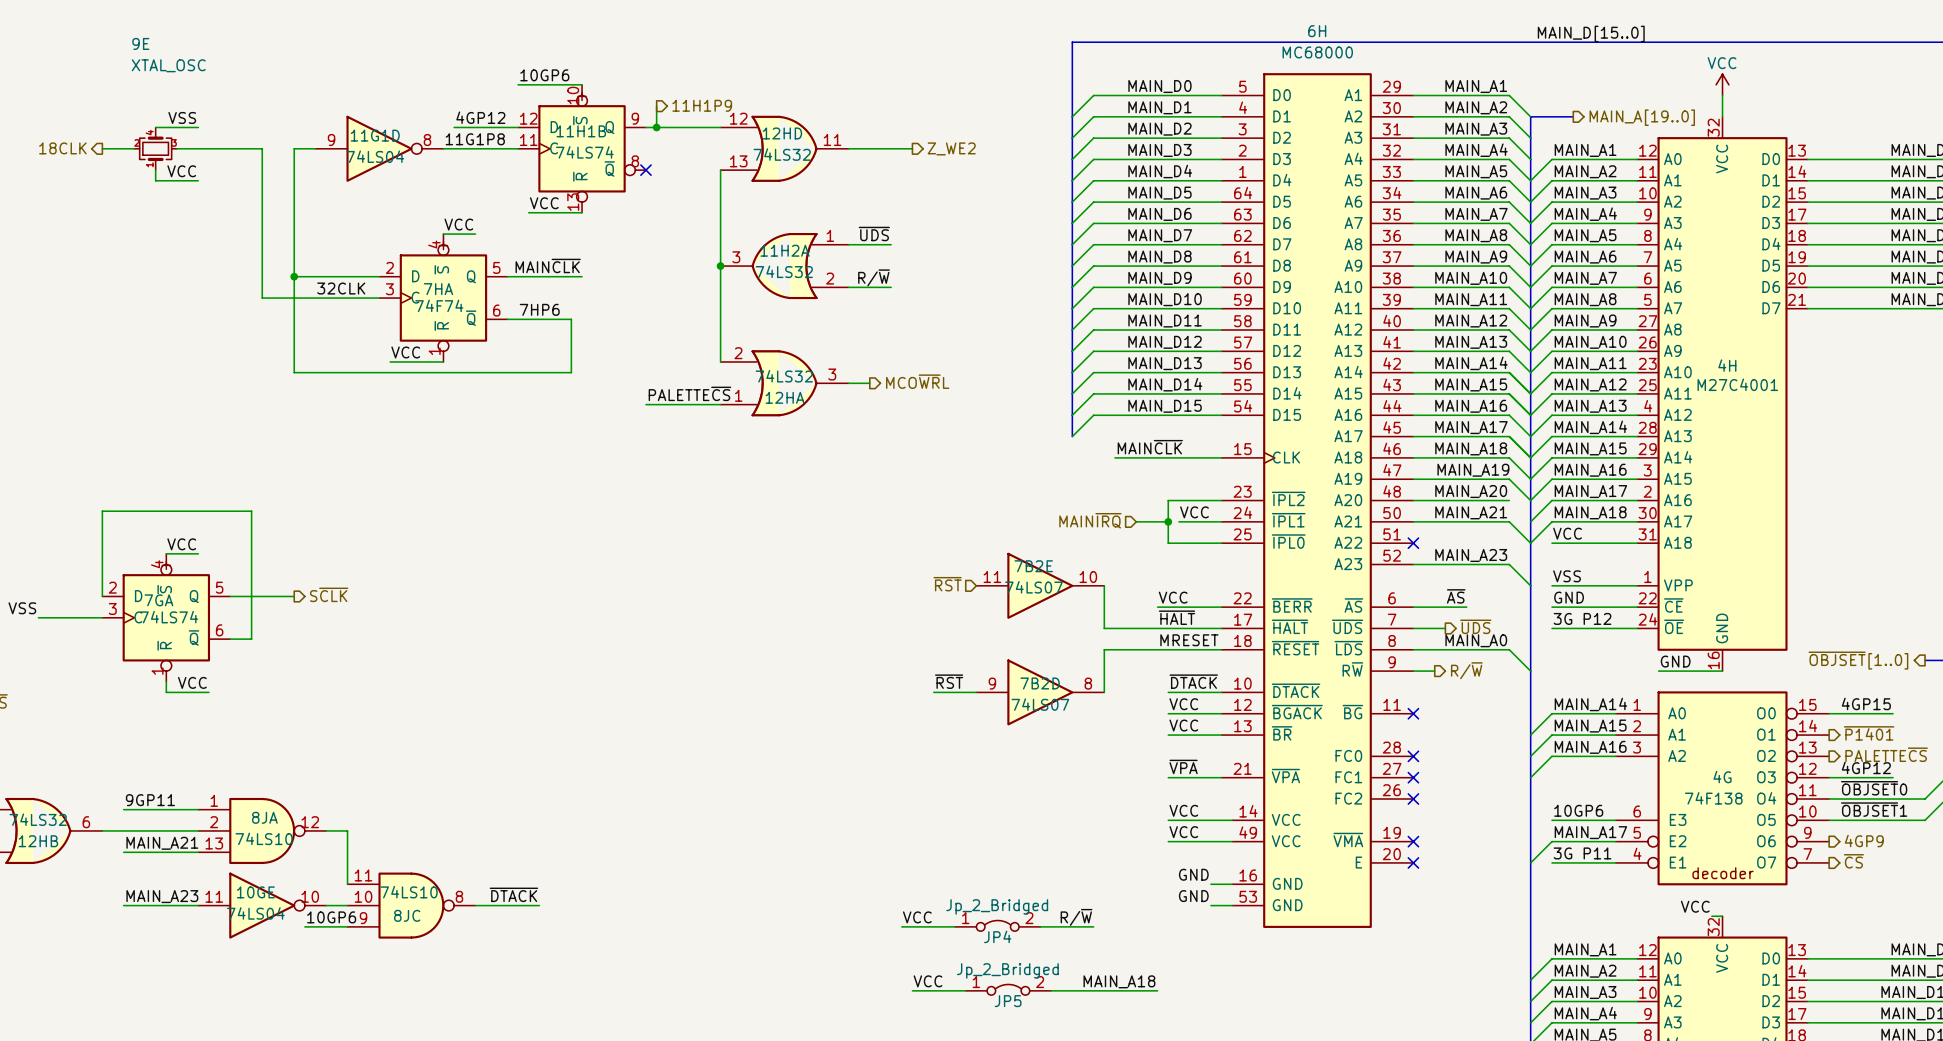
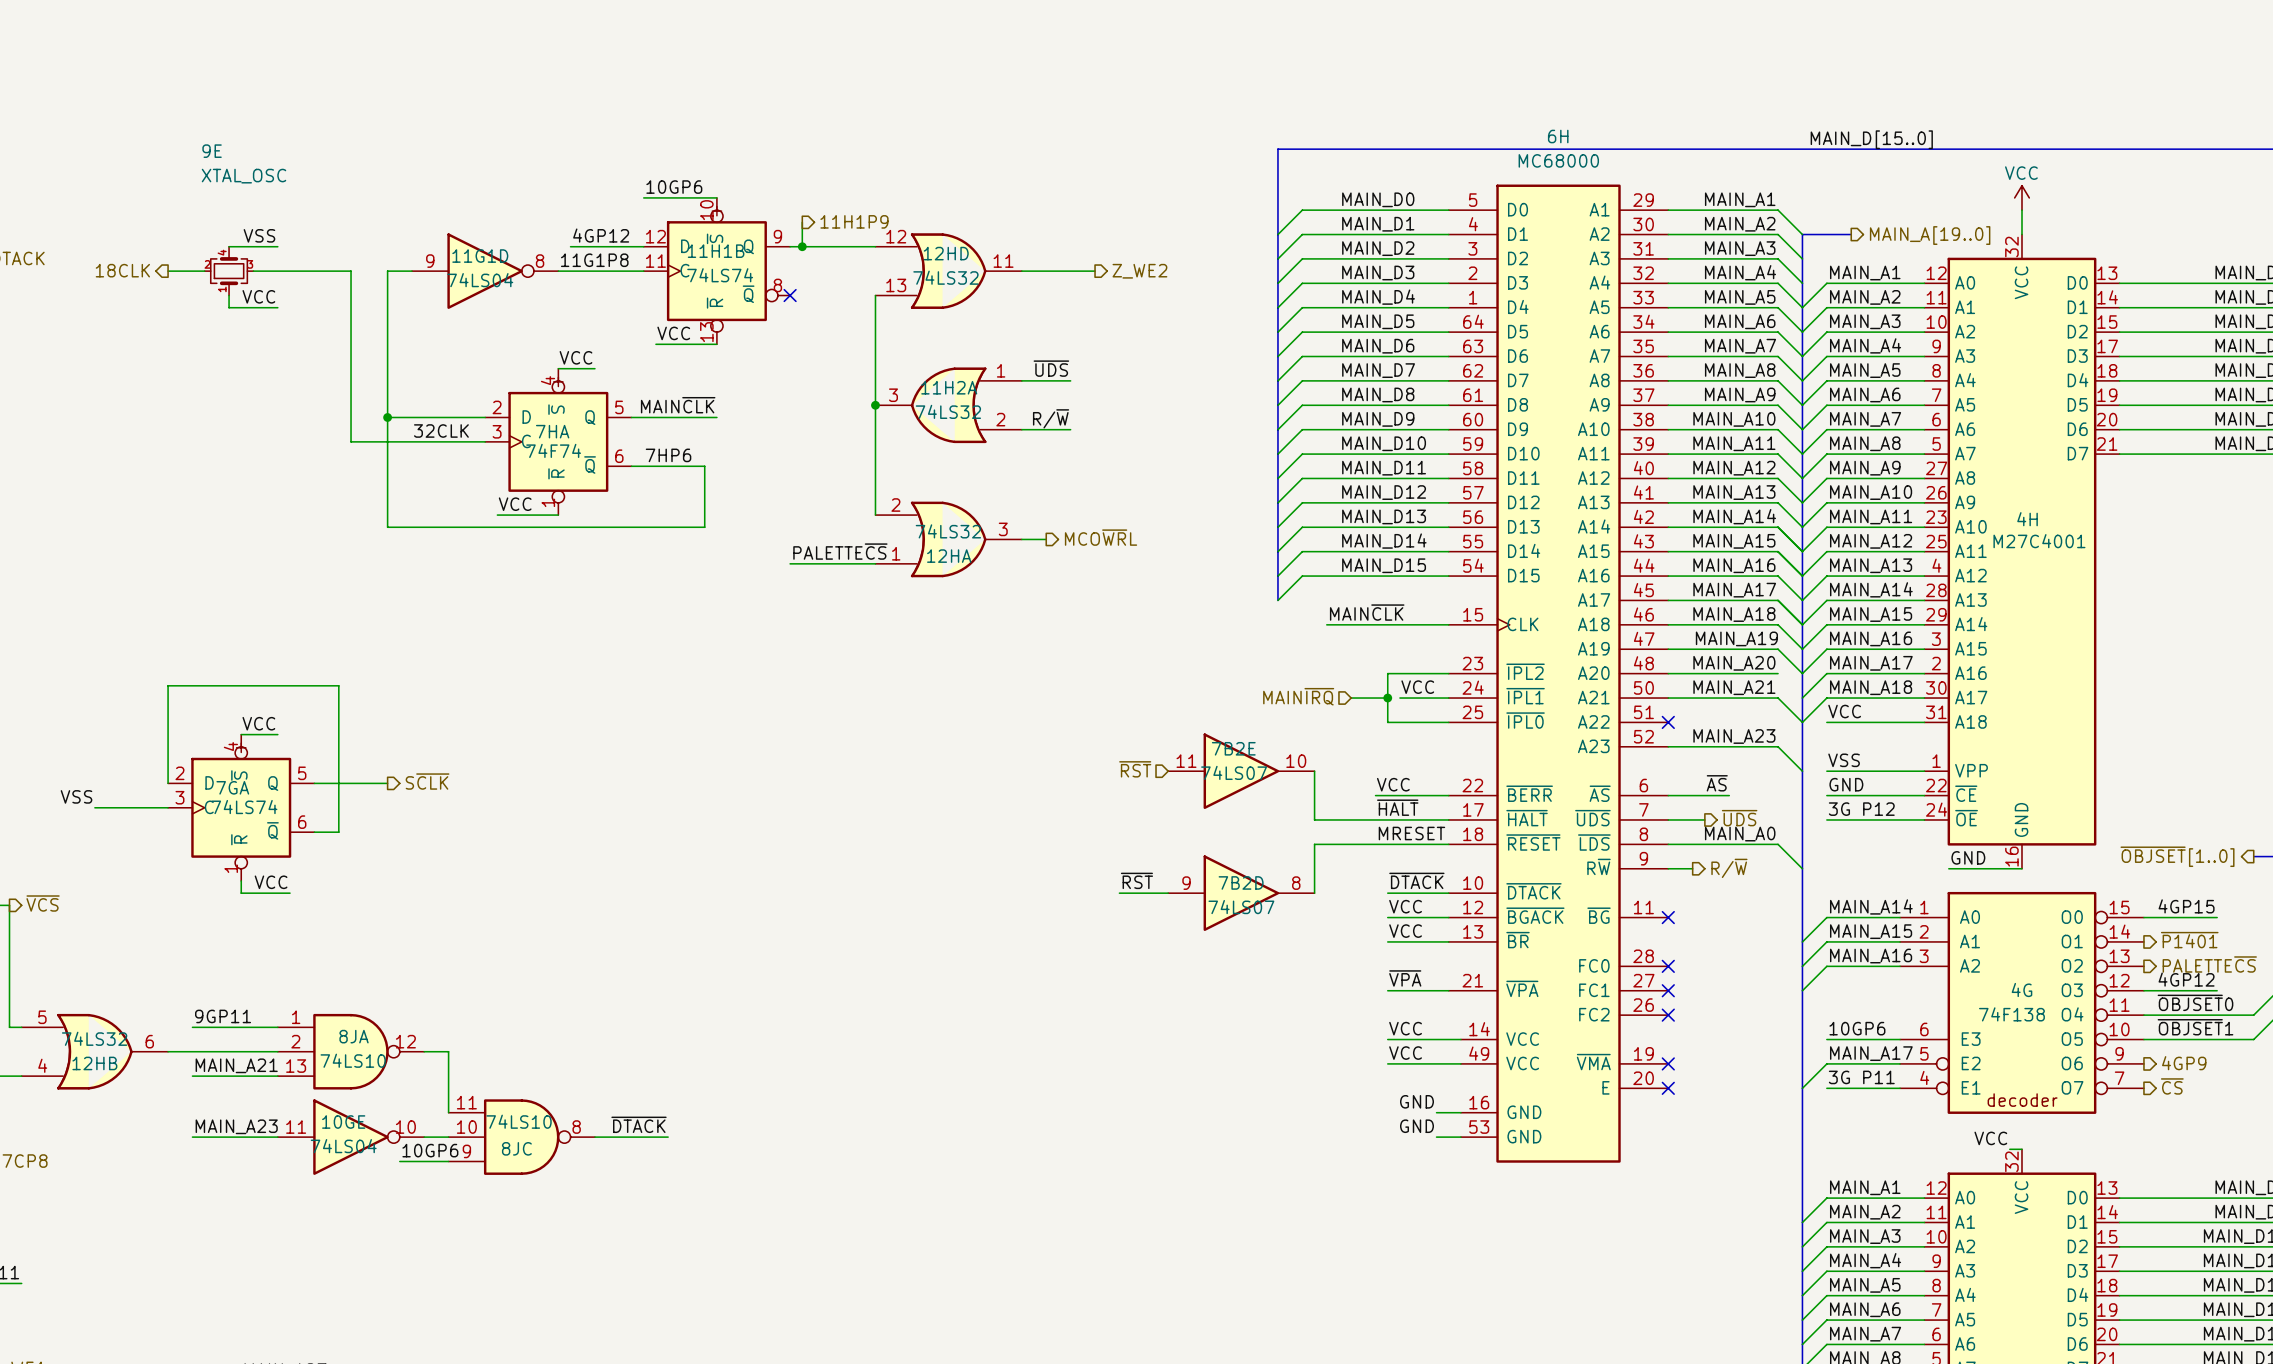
label: VCC (917, 917) -> none
label: R/~{W} (1076, 917) -> none
JP4: Jp_2_Bridged (997, 925) -> none
wire: (901, 926) (955, 926) -> none
wire: (1040, 926) (1093, 926) -> none
label: VCC (928, 981) -> none
label: MAIN_A18 (1119, 981) -> none
JP5: Jp_2_Bridged (1008, 989) -> none
wire: (912, 990) (965, 990) -> none
wire: (1051, 990) (1157, 990) -> none

